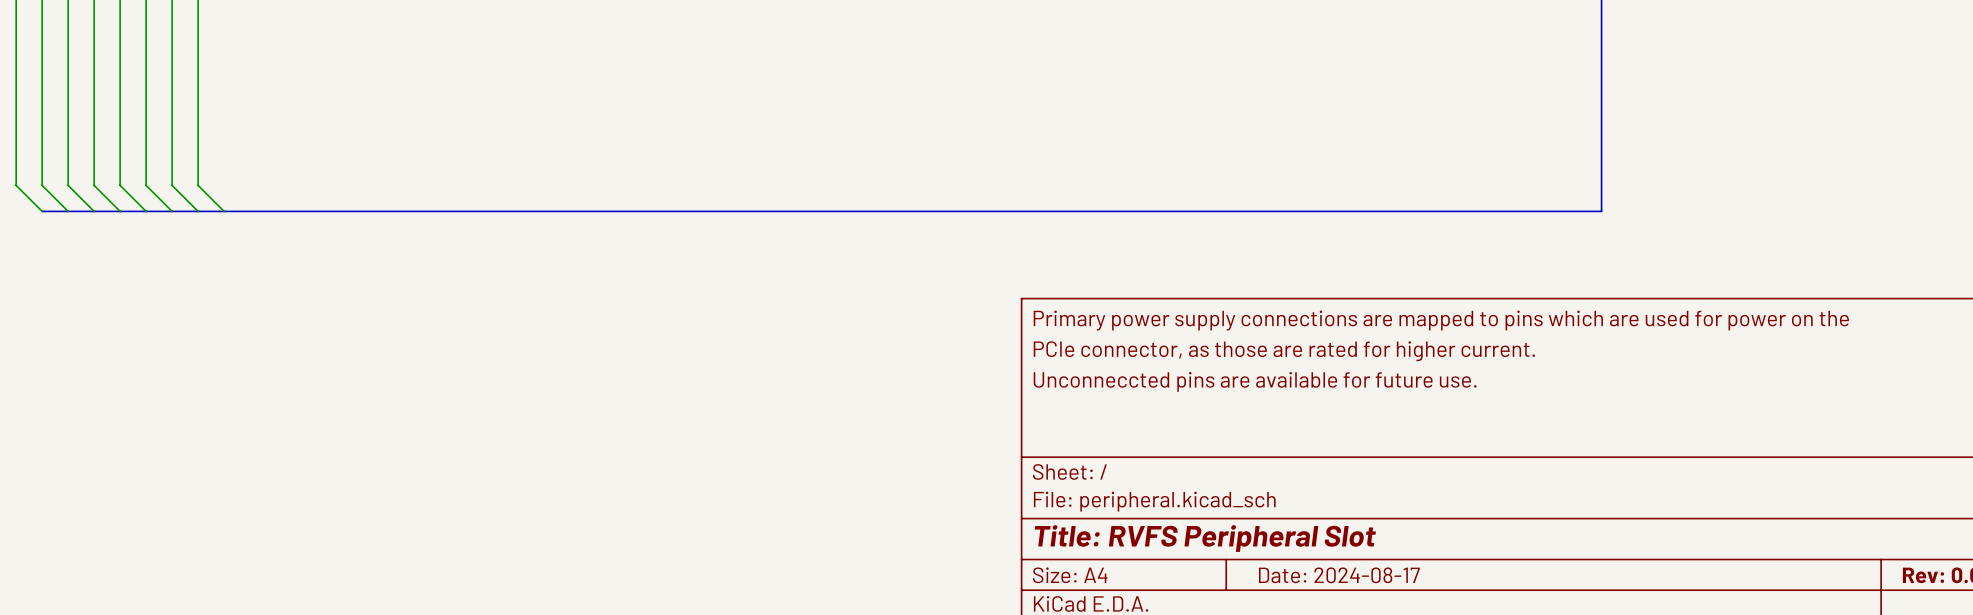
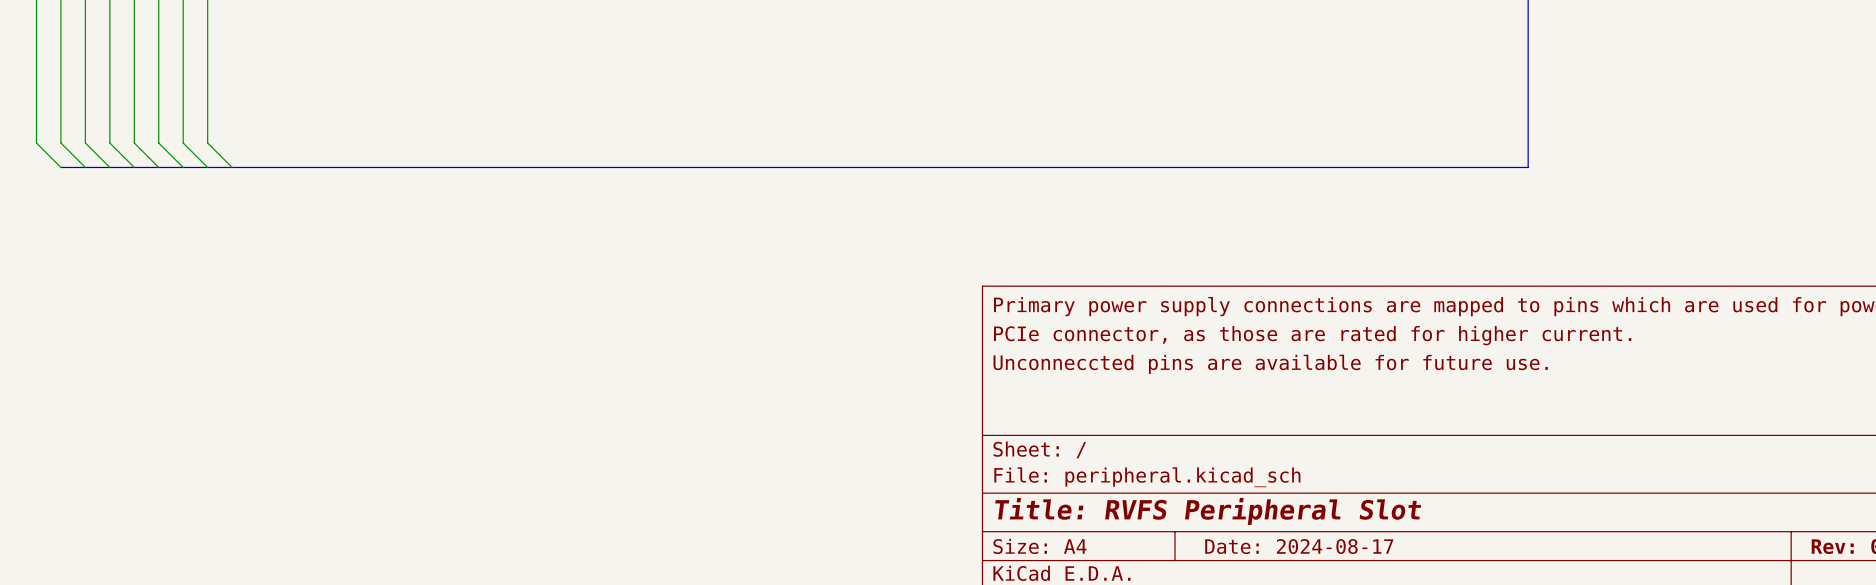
wire: (16, 146) (16, 185) (42, 211) -> (36, 143) (60, 167)
wire: (42, 146) (42, 185) (68, 211) -> (60, 143) (85, 167)
wire: (68, 146) (68, 185) (94, 211) -> (85, 143) (109, 167)
wire: (94, 146) (94, 185) (120, 211) -> (109, 143) (134, 167)
wire: (120, 146) (120, 185) (146, 211) -> (134, 143) (158, 167)
wire: (146, 146) (146, 185) (172, 211) -> (158, 143) (183, 167)
wire: (172, 146) (172, 185) (198, 211) -> (183, 143) (207, 167)
wire: (198, 146) (198, 185) (224, 211) -> (207, 143) (232, 167)
bus: (1601, 172) (1601, 211) (42, 211) -> (1528, 167) (60, 167)

